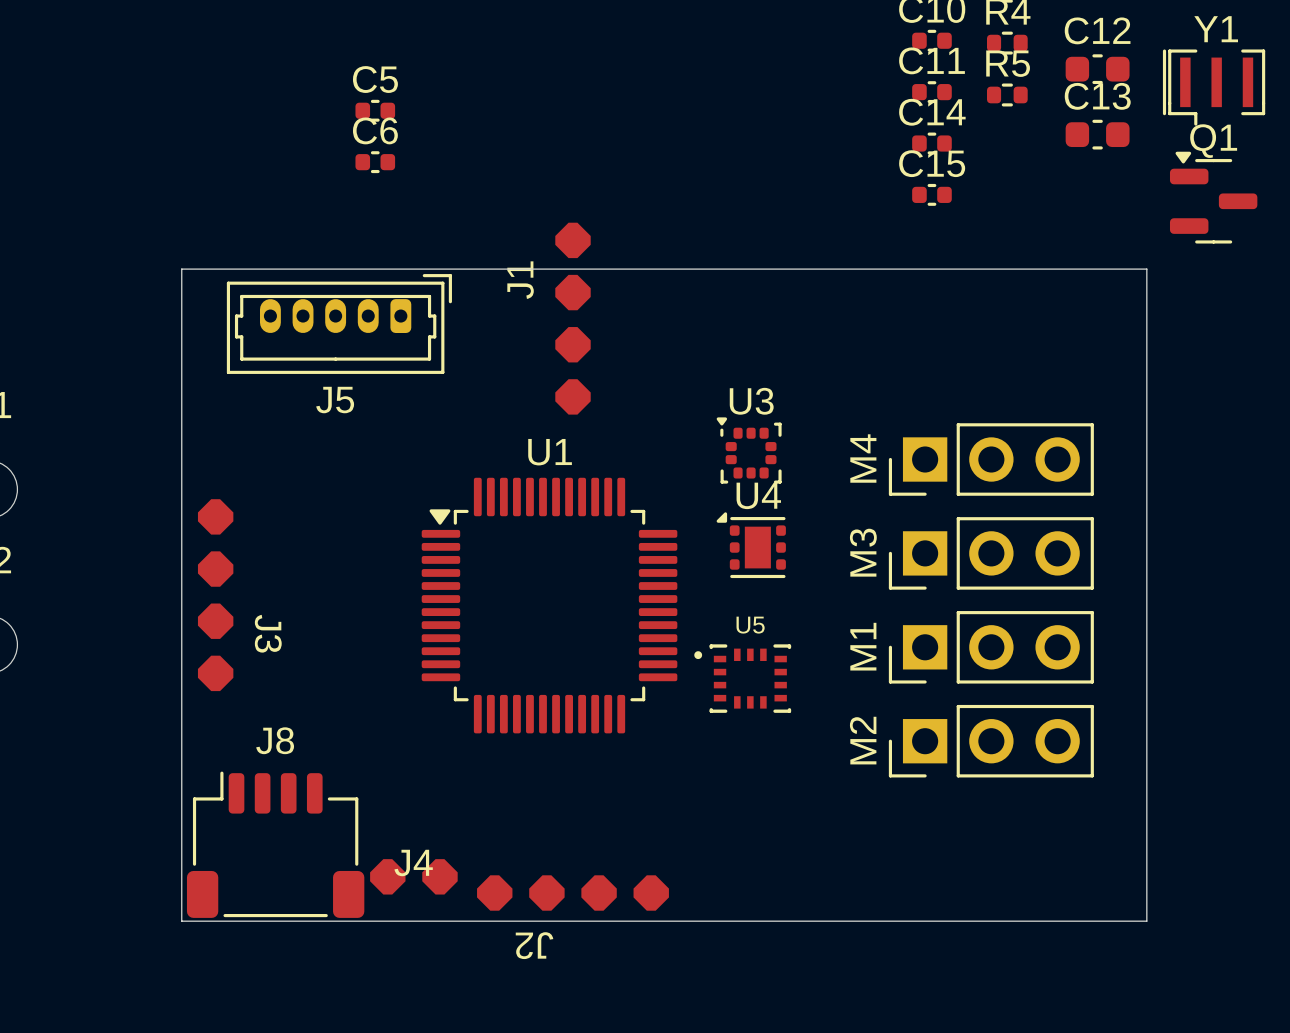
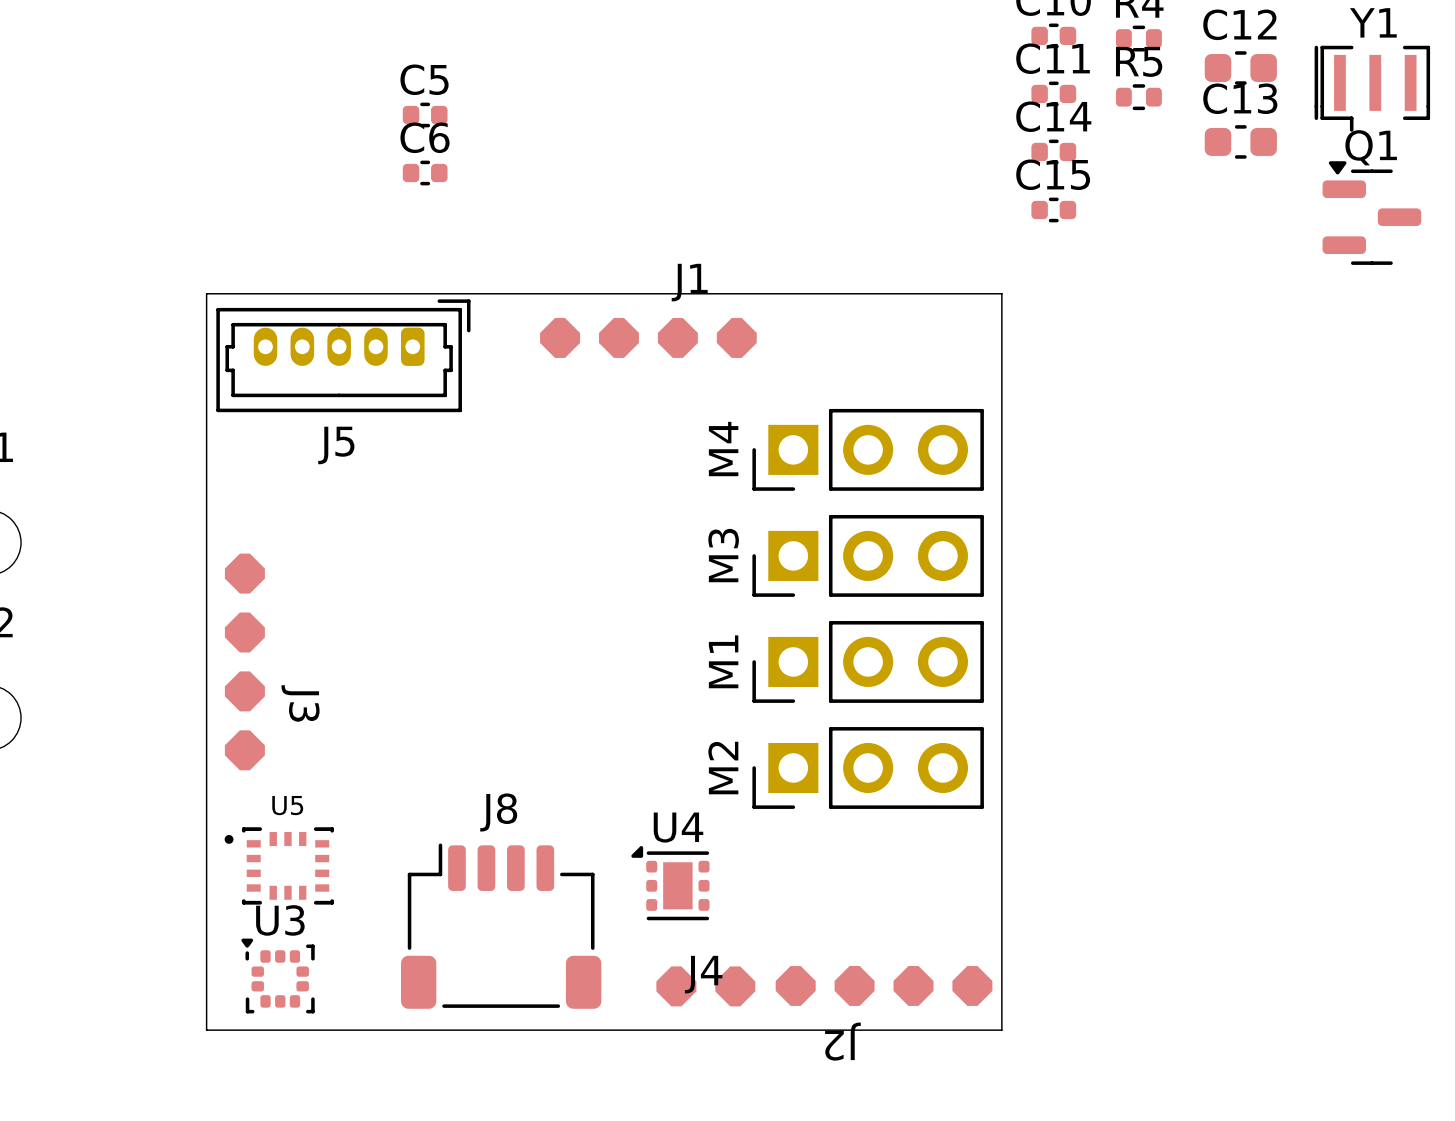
board edge: (885, 269) (1146, 269) (1146, 921) (885, 921) -> (1001, 293) (1001, 1030)
J1 rotation: 0° (573, 318) -> 90° clockwise (648, 337)
J5 position: (339, 324) -> (343, 355)
U3 position: (749, 450) -> (278, 976)
M4 position: (991, 459) -> (868, 449)
U4 position: (751, 545) -> (670, 883)
M3 position: (991, 553) -> (868, 555)
U1: (549, 605) -> none
M1 position: (991, 647) -> (868, 661)
U5 position: (742, 678) -> (279, 865)
M2 position: (991, 741) -> (868, 767)
J8 position: (275, 844) -> (501, 926)
J4 position: (413, 876) -> (705, 986)
J2 position: (572, 893) -> (884, 985)

